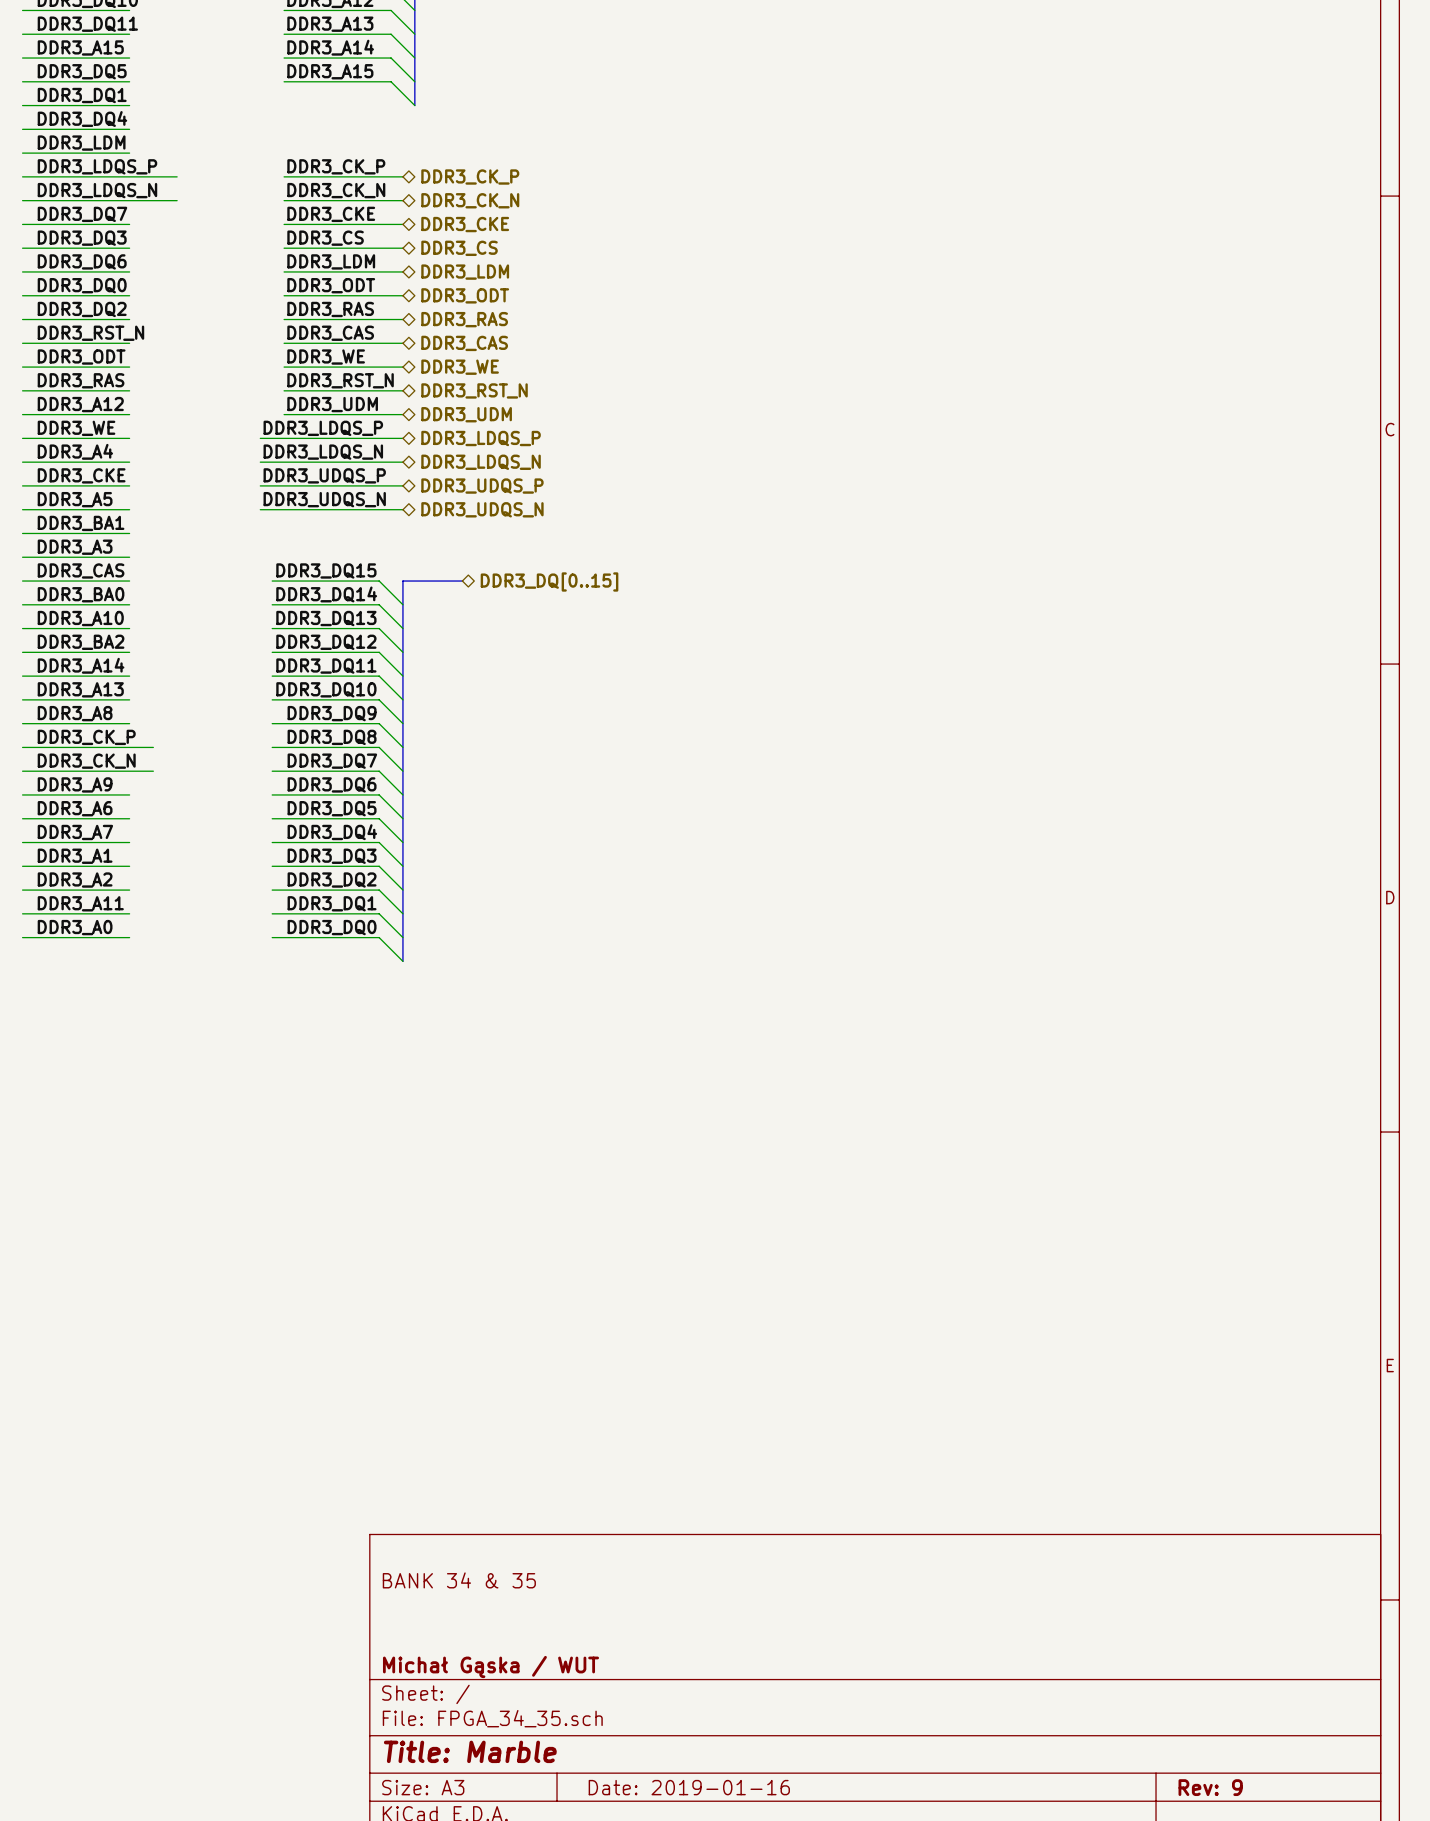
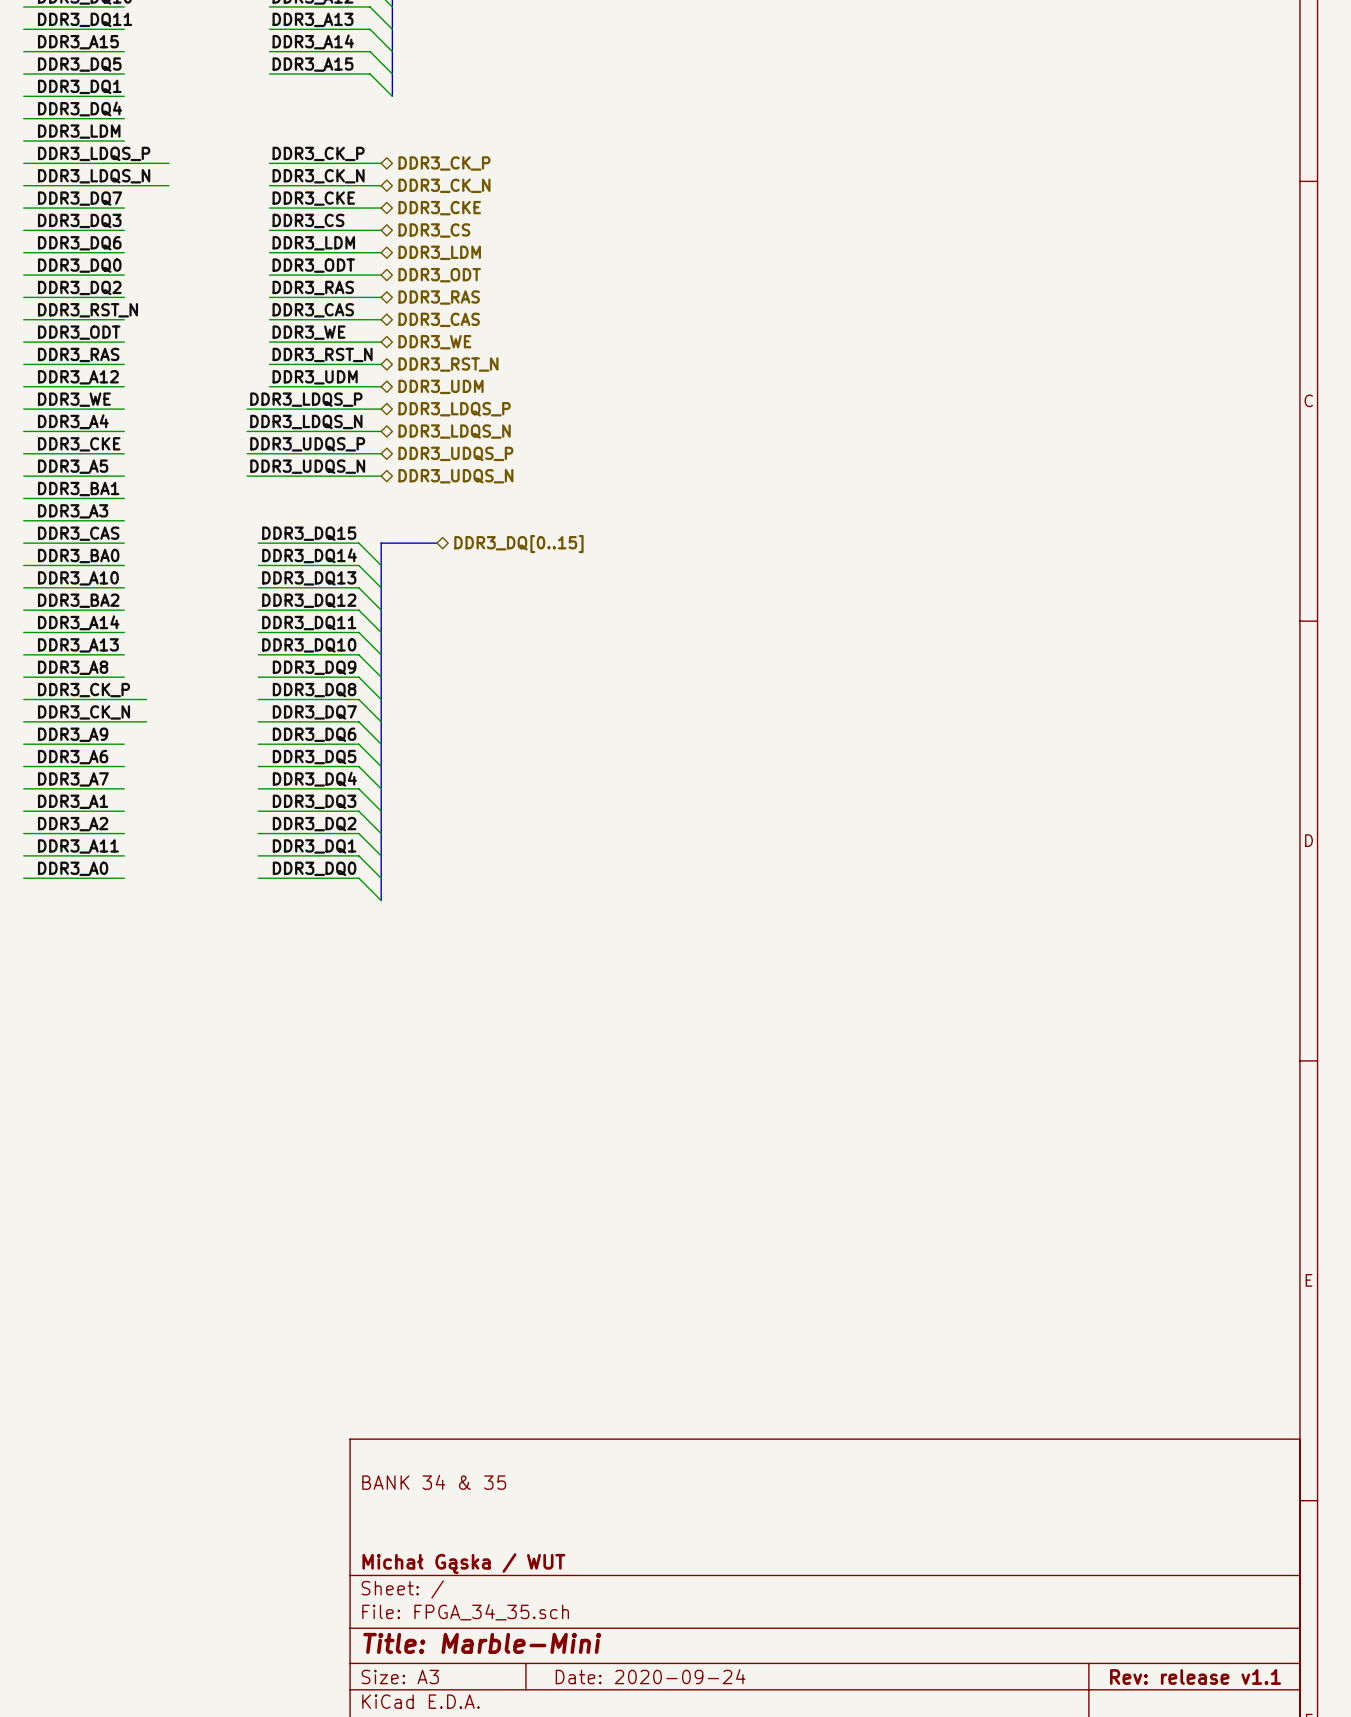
title block: Title: Marble (470, 1751) -> Title: Marble-Mini (482, 1643)
title block: Date: 2019-01-16 (689, 1787) -> Date: 2020-09-24 (650, 1676)
title block: Rev: 9 (1210, 1787) -> Rev: release v1.1 (1195, 1676)

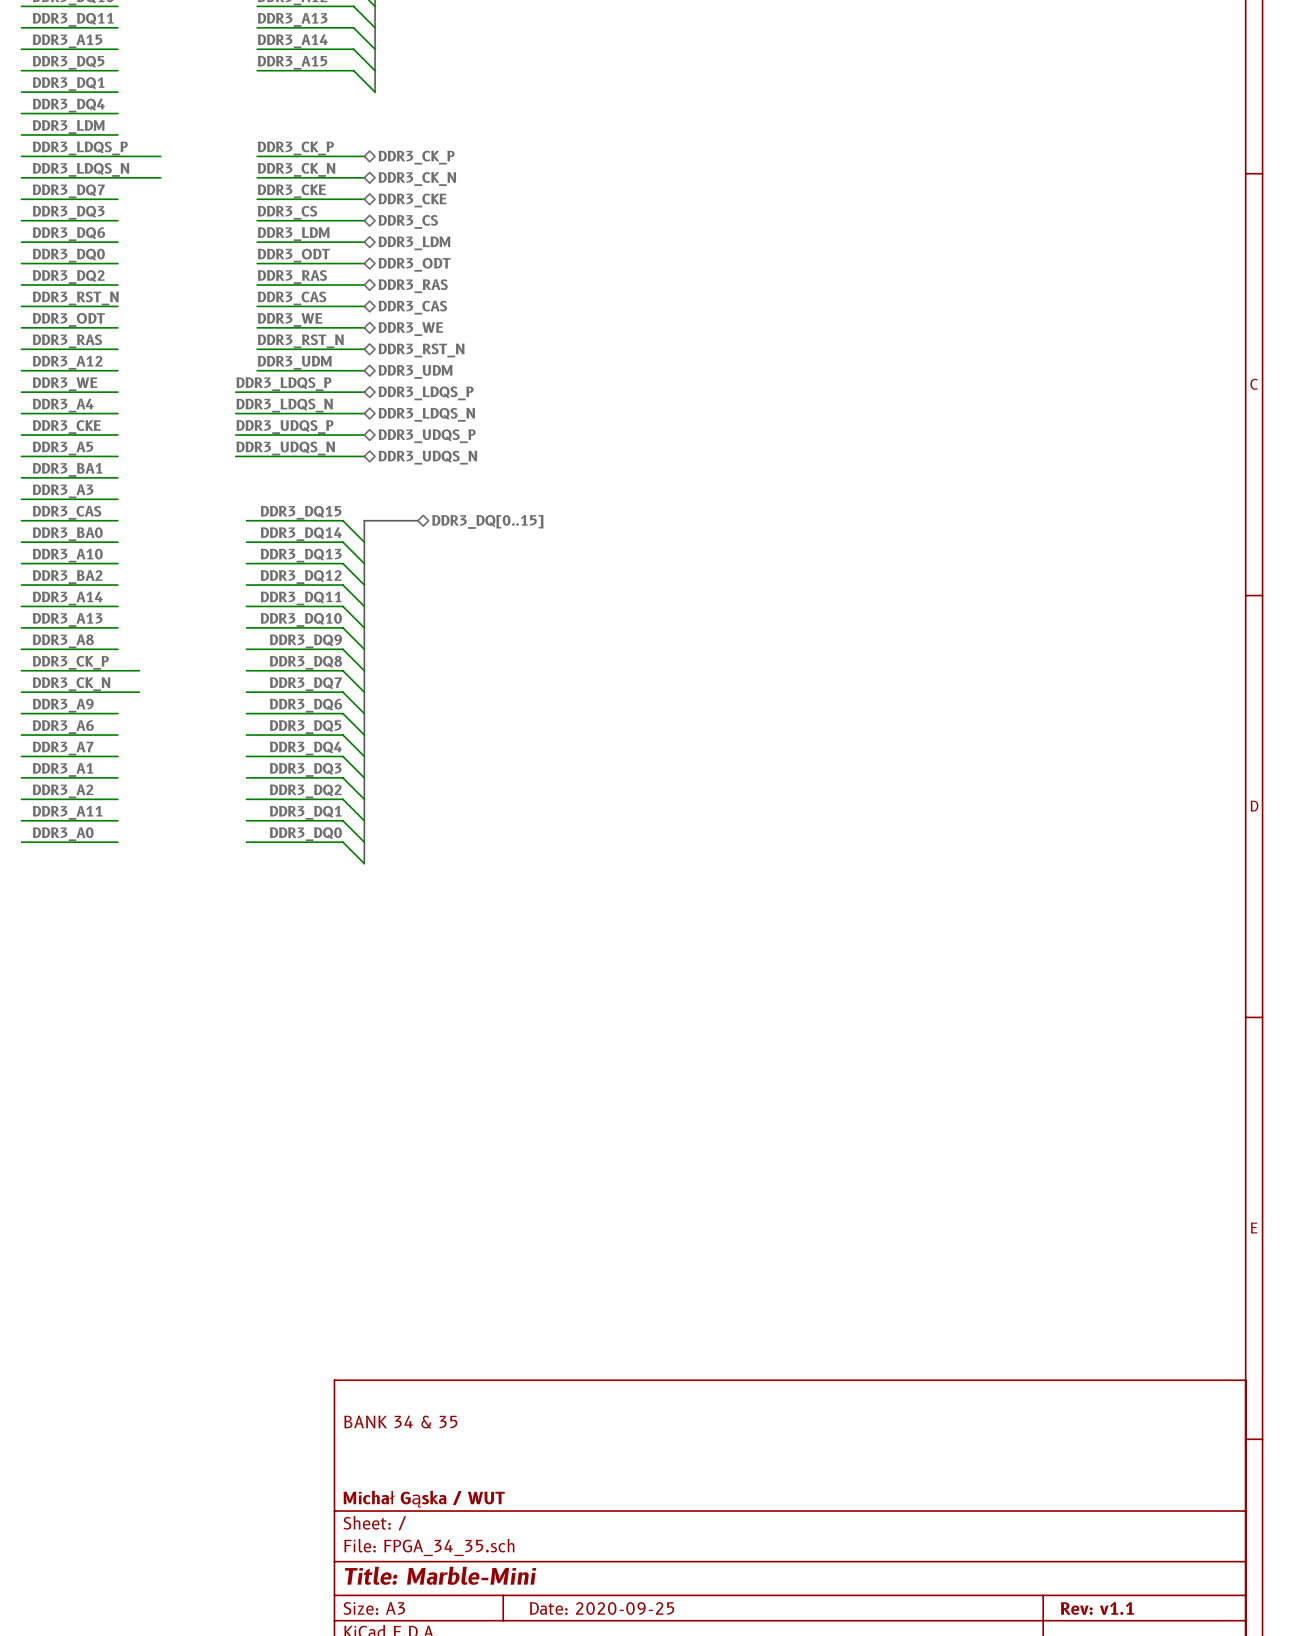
title block: Date: 2020-09-24 (650, 1676) -> Date: 2020-09-25 (602, 1608)
title block: Rev: release v1.1 (1195, 1676) -> Rev: v1.1 (1097, 1608)

